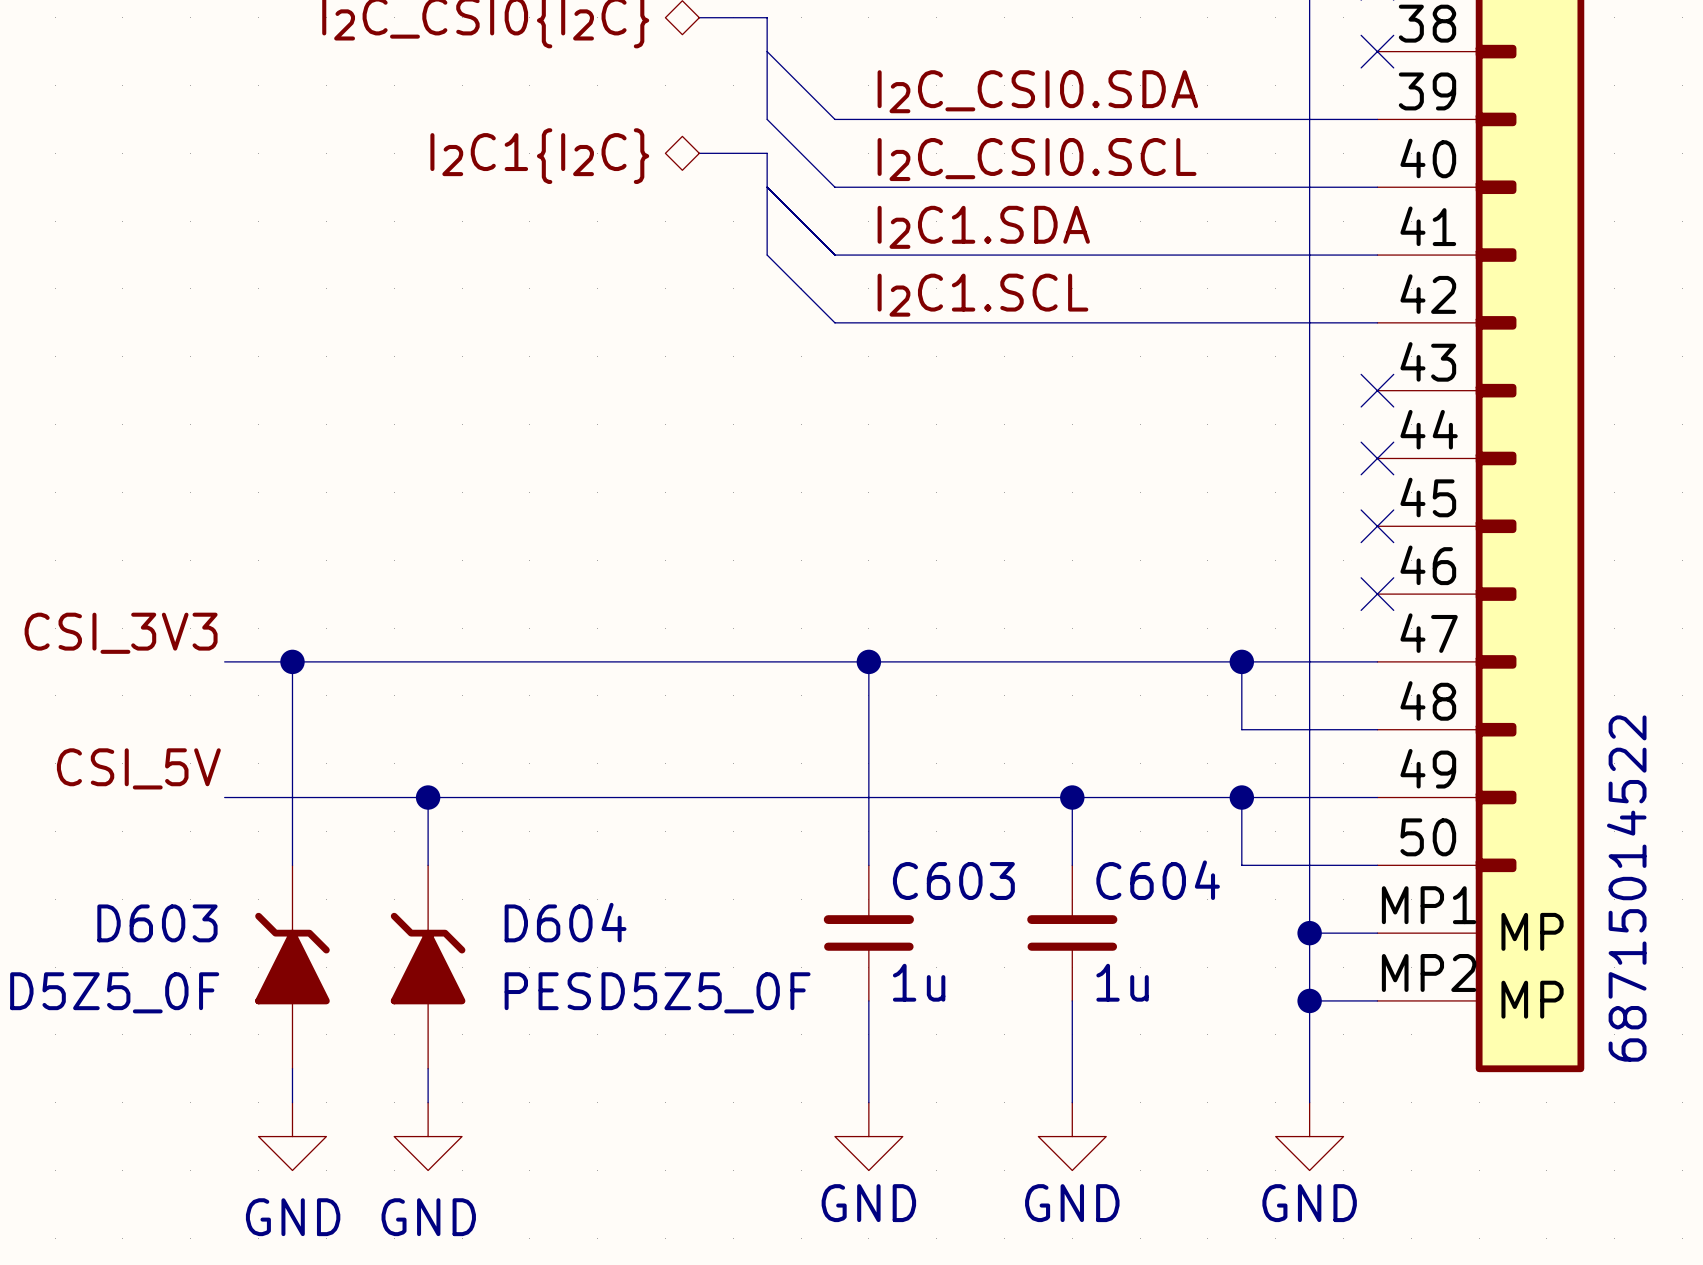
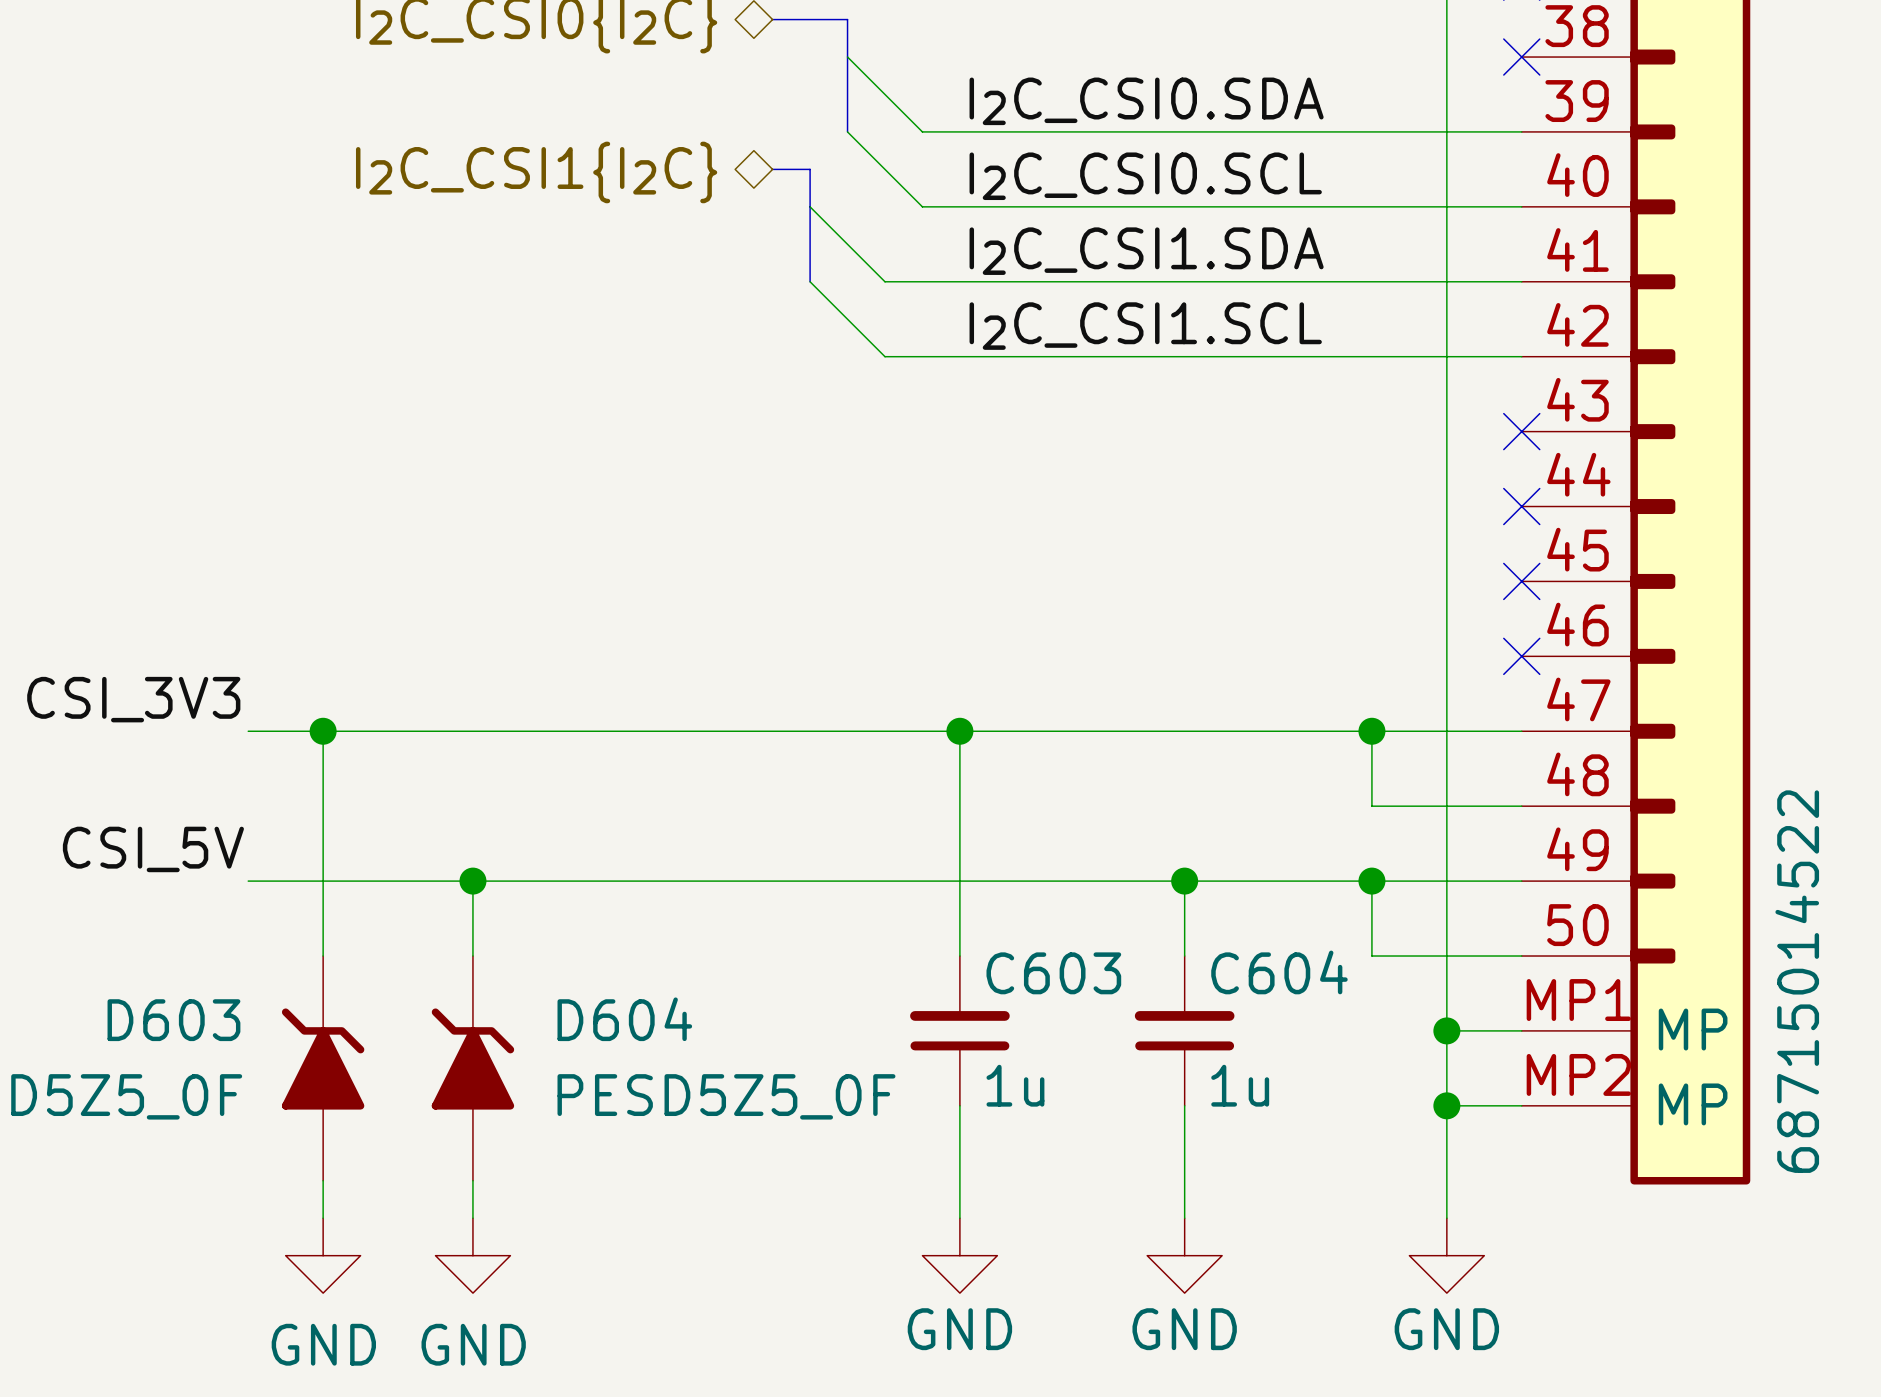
bus: (733, 153) (767, 153) (767, 255) -> (810, 169) (810, 281)
hierarchical label: I2C1{I2C} (539, 156) -> I2C_CSI1{I2C} (536, 172)
wire: (767, 187) (834, 255) -> (810, 206) (884, 281) (922, 281)
label: I2C1.SDA (983, 227) -> I2C_CSI1.SDA (1146, 251)
wire: (767, 255) (834, 322) -> (810, 281) (884, 356) (922, 356)
label: I2C1.SCL (982, 295) -> I2C_CSI1.SCL (1145, 326)

